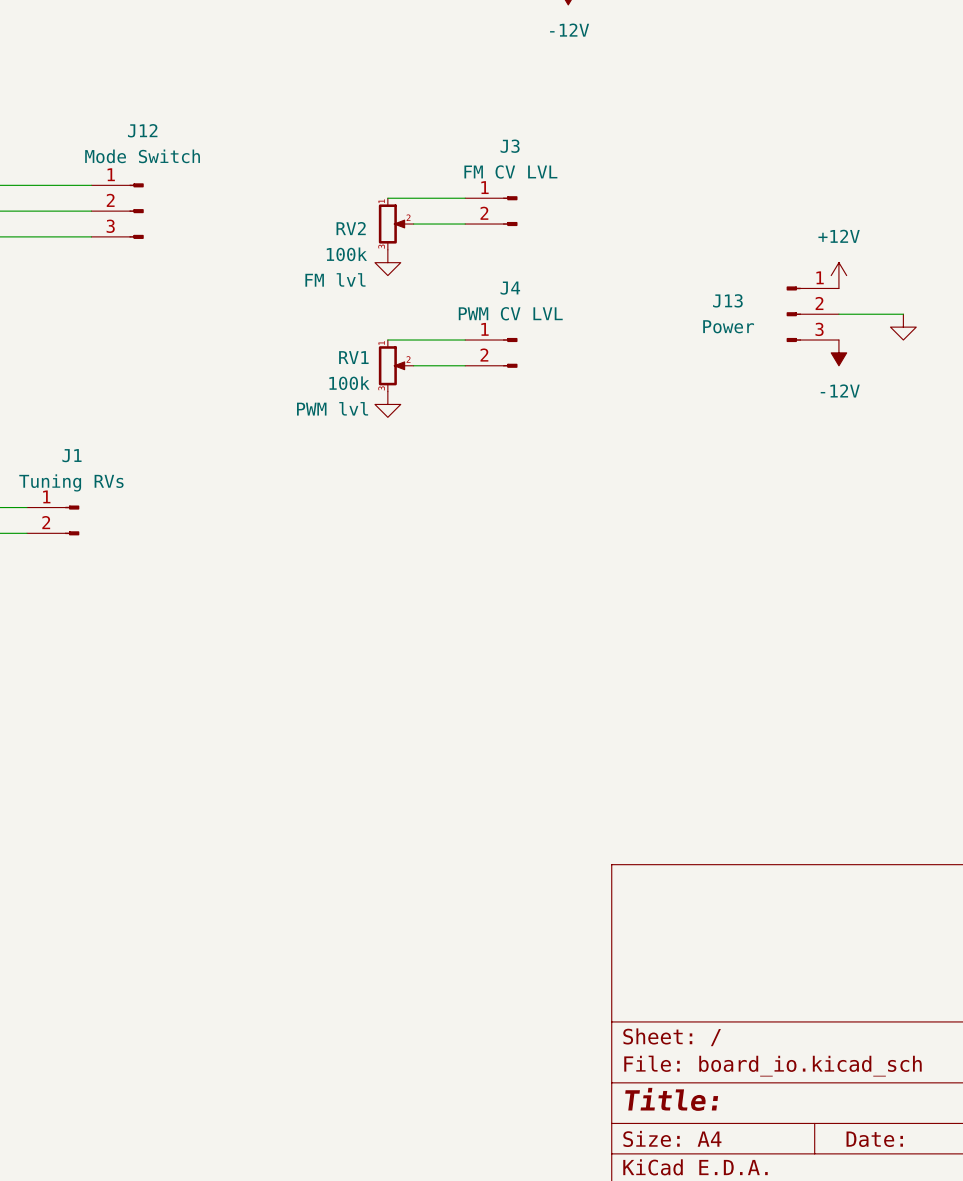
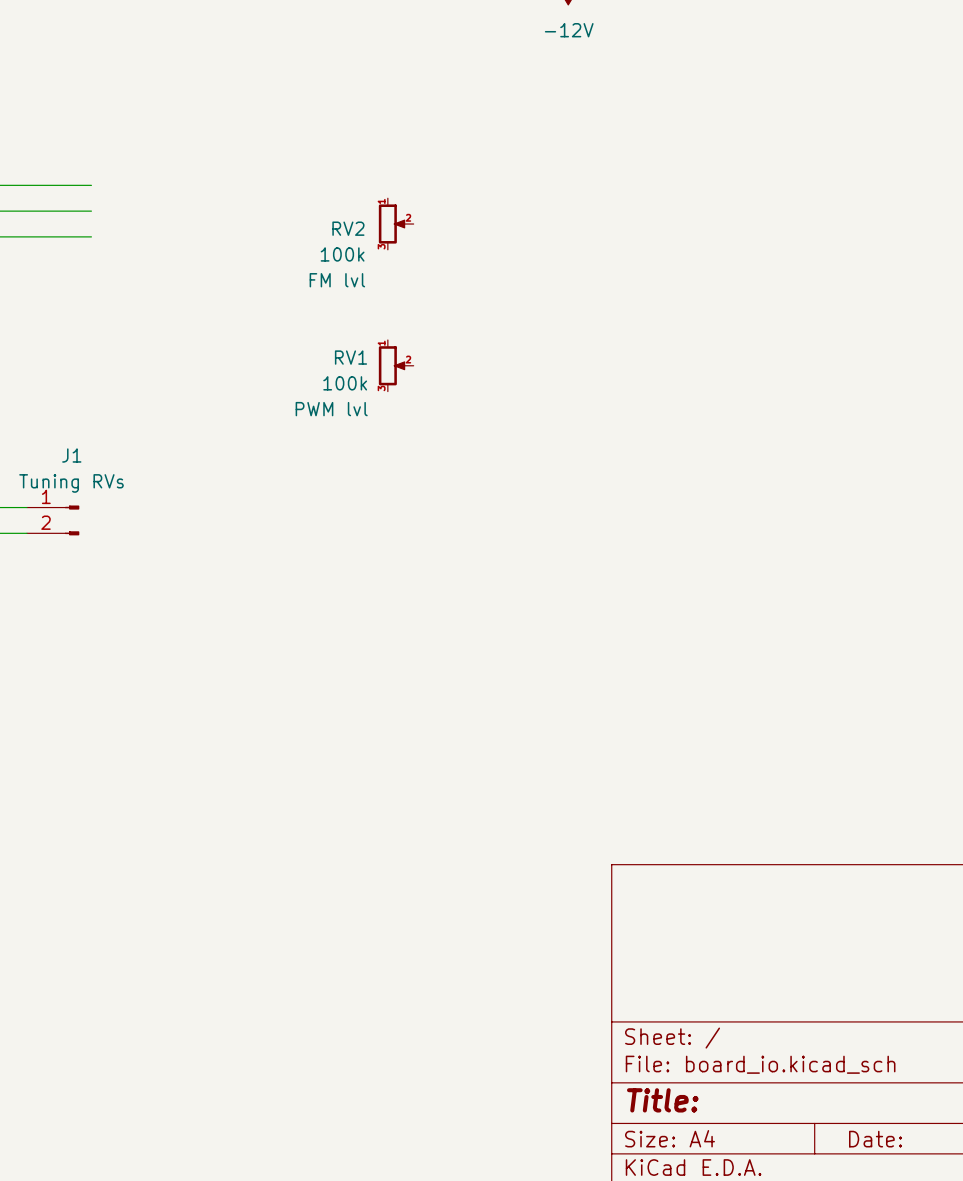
wire: (387, 198) (465, 198) -> none
J12: Mode Switch (117, 211) -> none
J3: FM CV LVL (491, 211) -> none
wire: (413, 224) (465, 224) -> none
power symbol: (387, 262) -> none
power symbol: +12V (838, 275) -> none
J13: Power (812, 314) -> none
wire: (838, 314) (903, 314) -> none
power symbol: (903, 327) -> none
wire: (387, 340) (465, 340) -> none
J4: PWM CV LVL (491, 352) -> none
power symbol: -12V (838, 352) -> none
wire: (413, 365) (465, 365) -> none
power symbol: (387, 404) -> none

